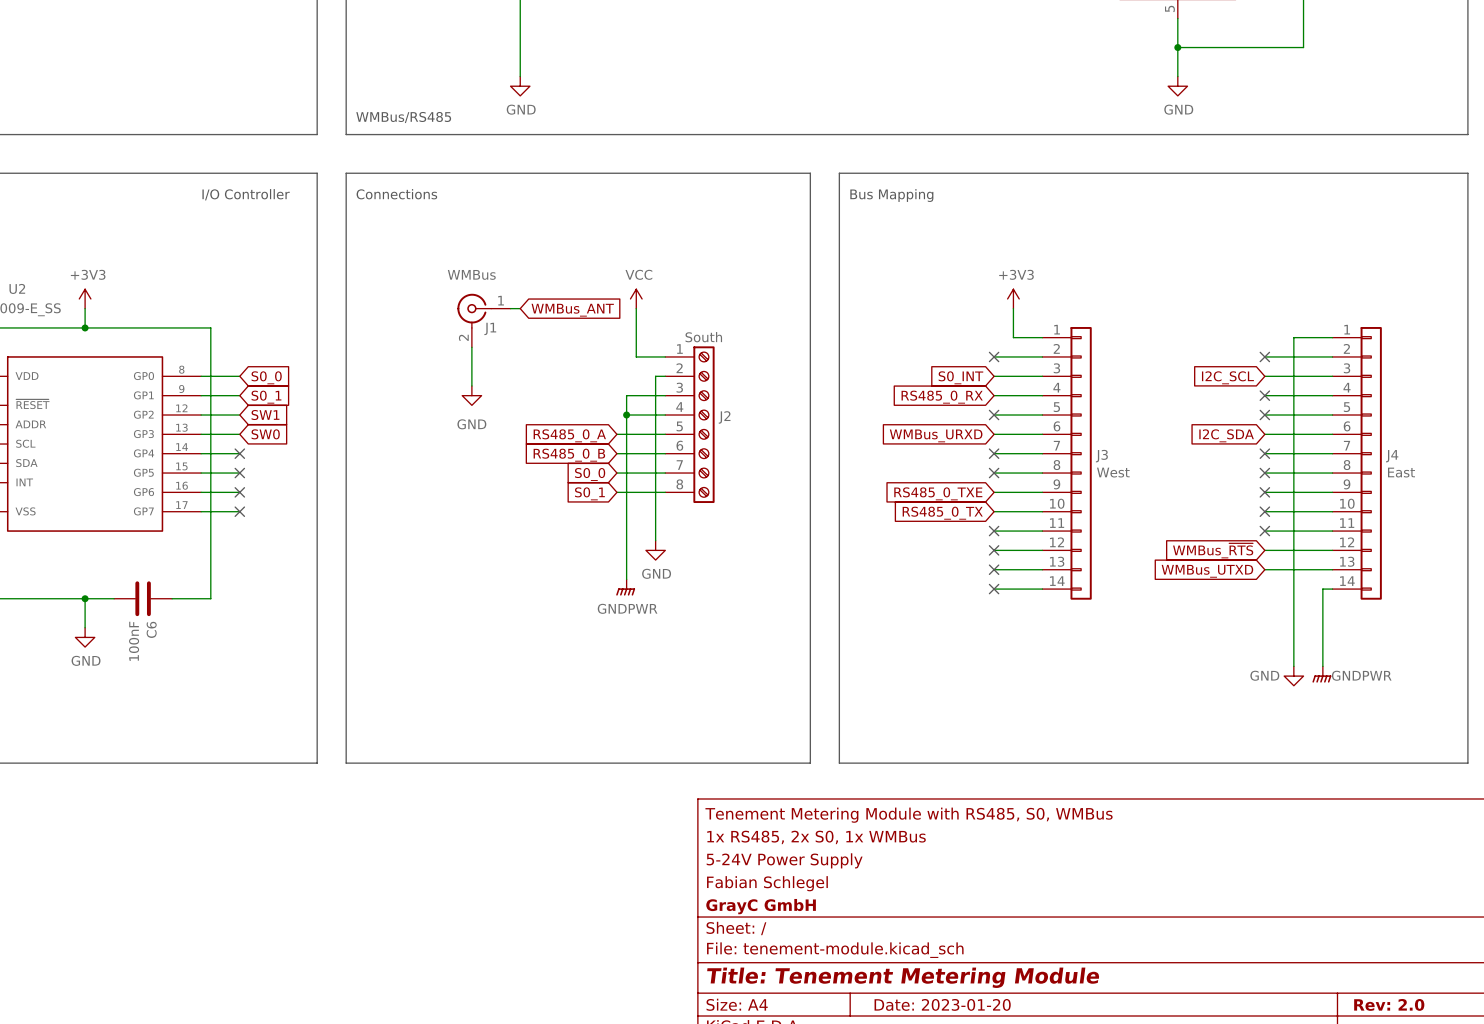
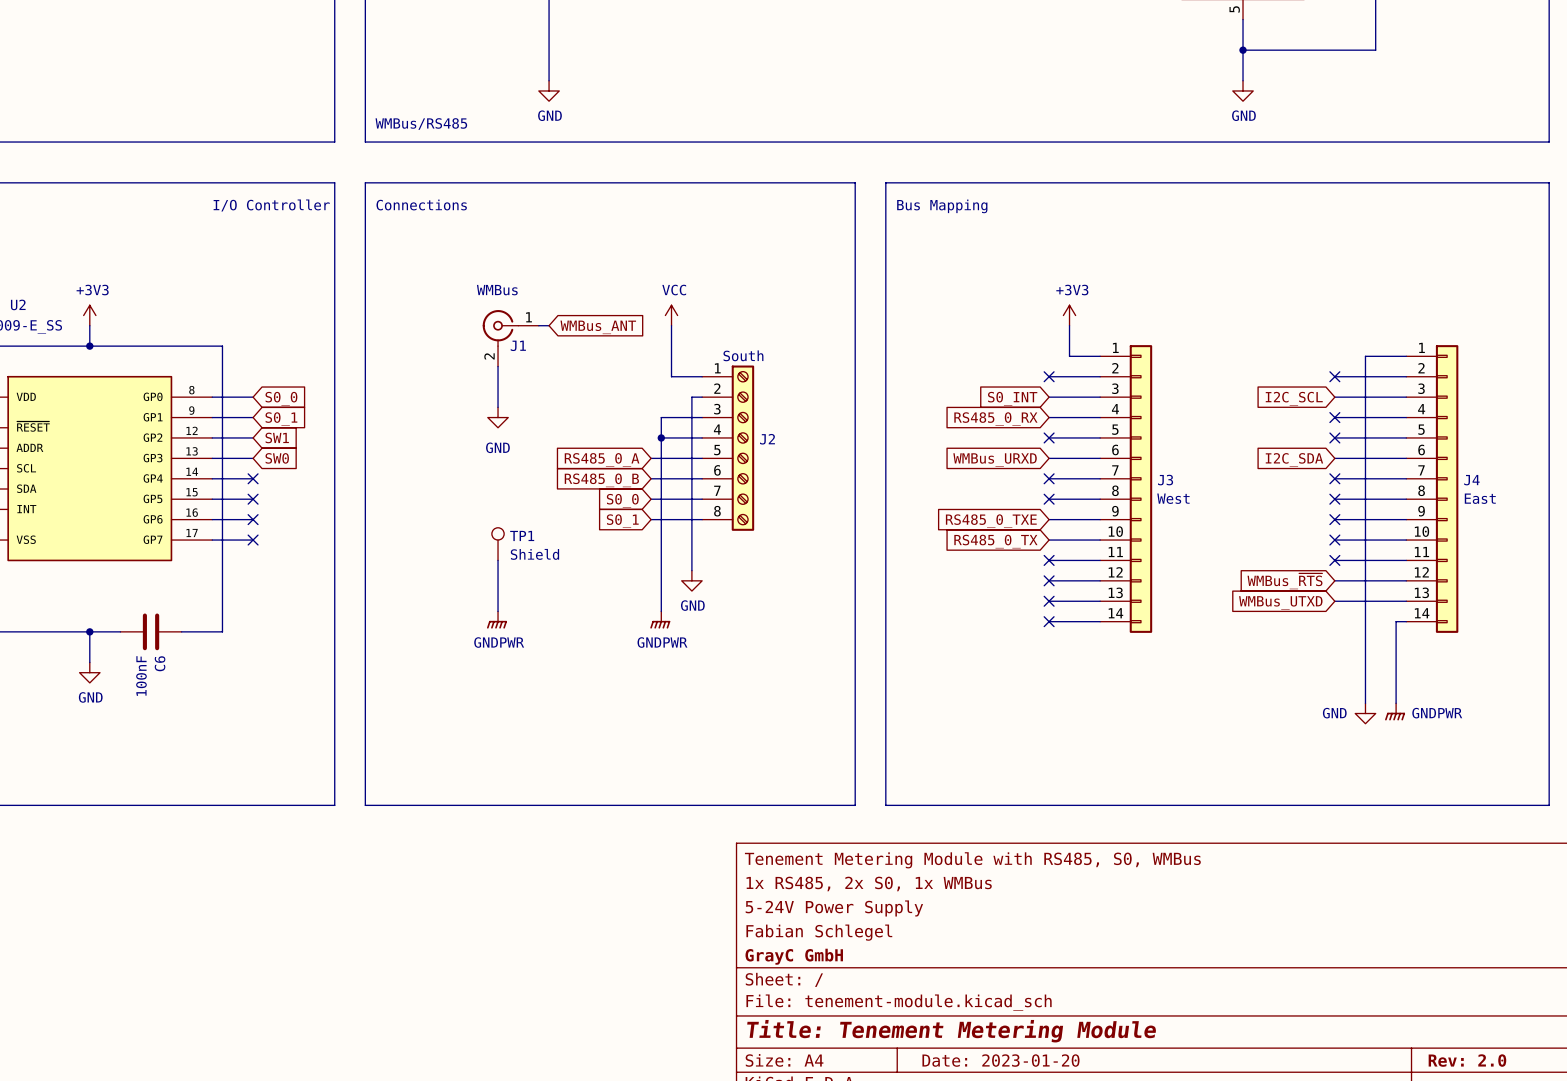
TP1: none -> Shield (498, 544)
wire: none -> (498, 560) (498, 611)
power symbol: none -> GNDPWR (496, 620)

